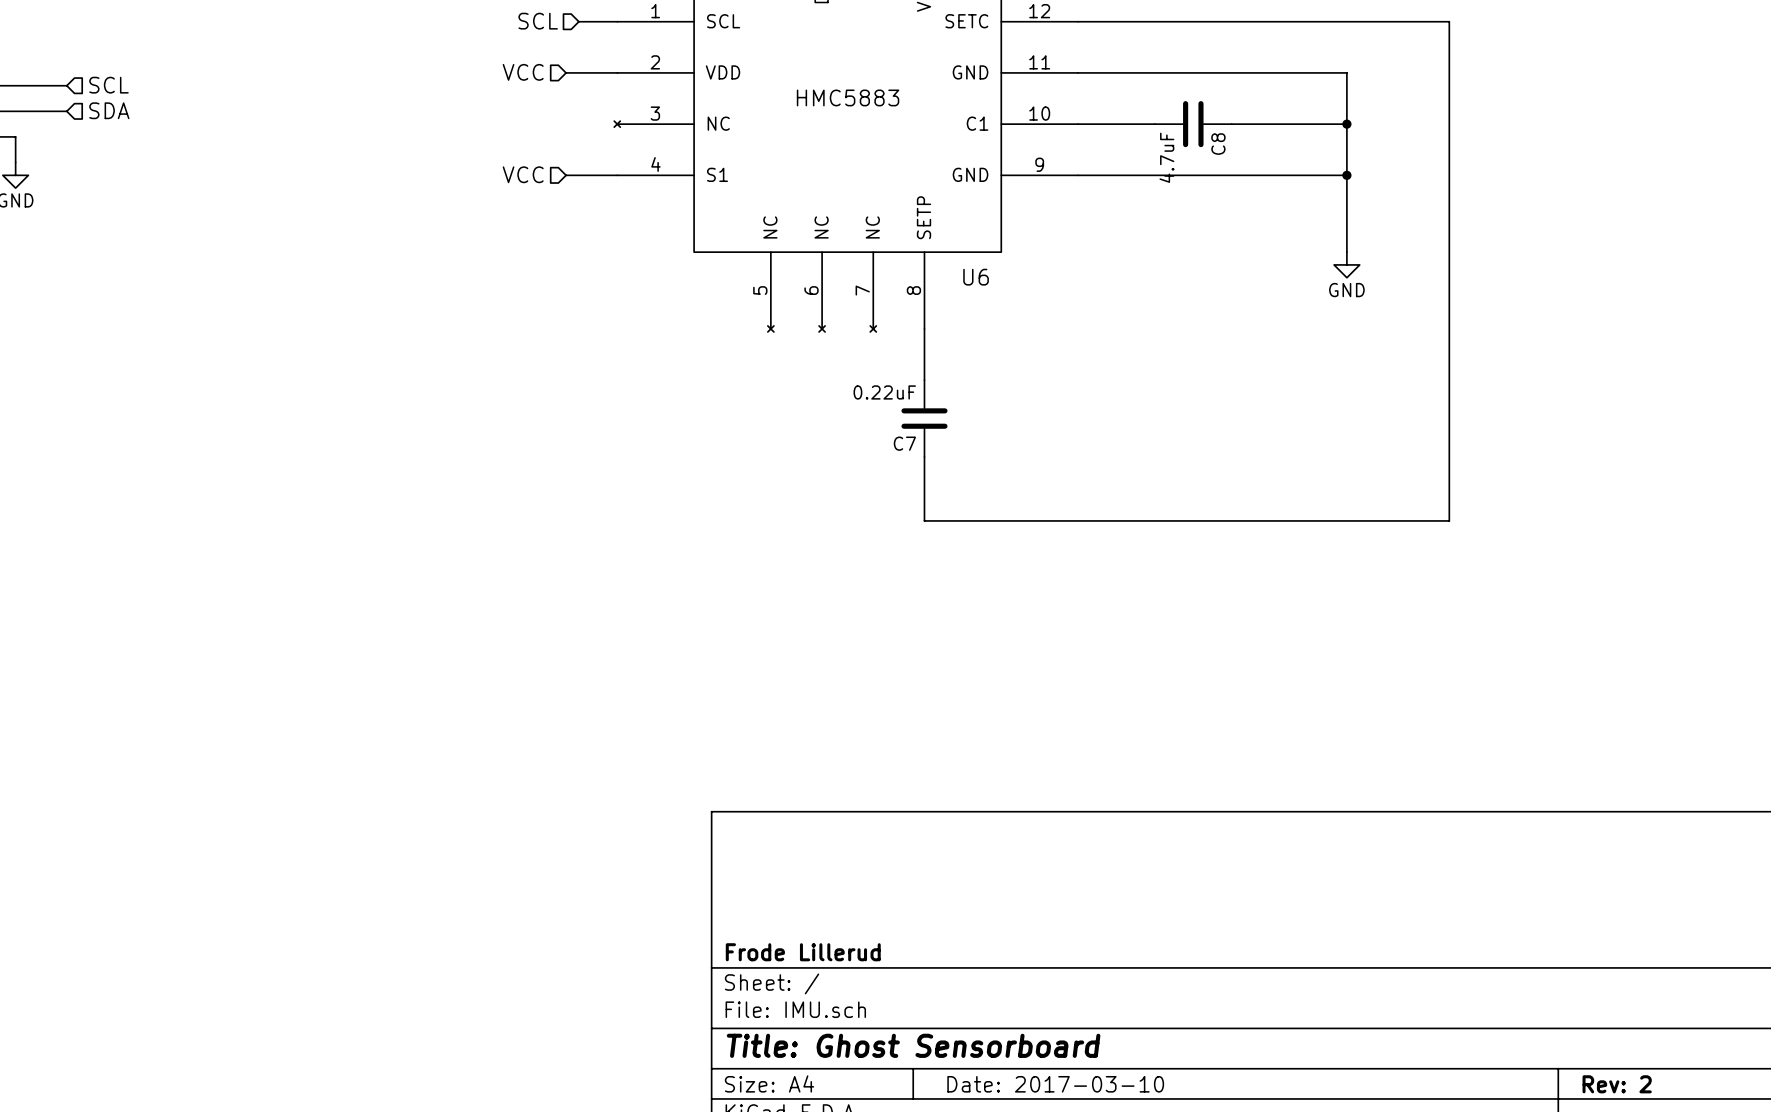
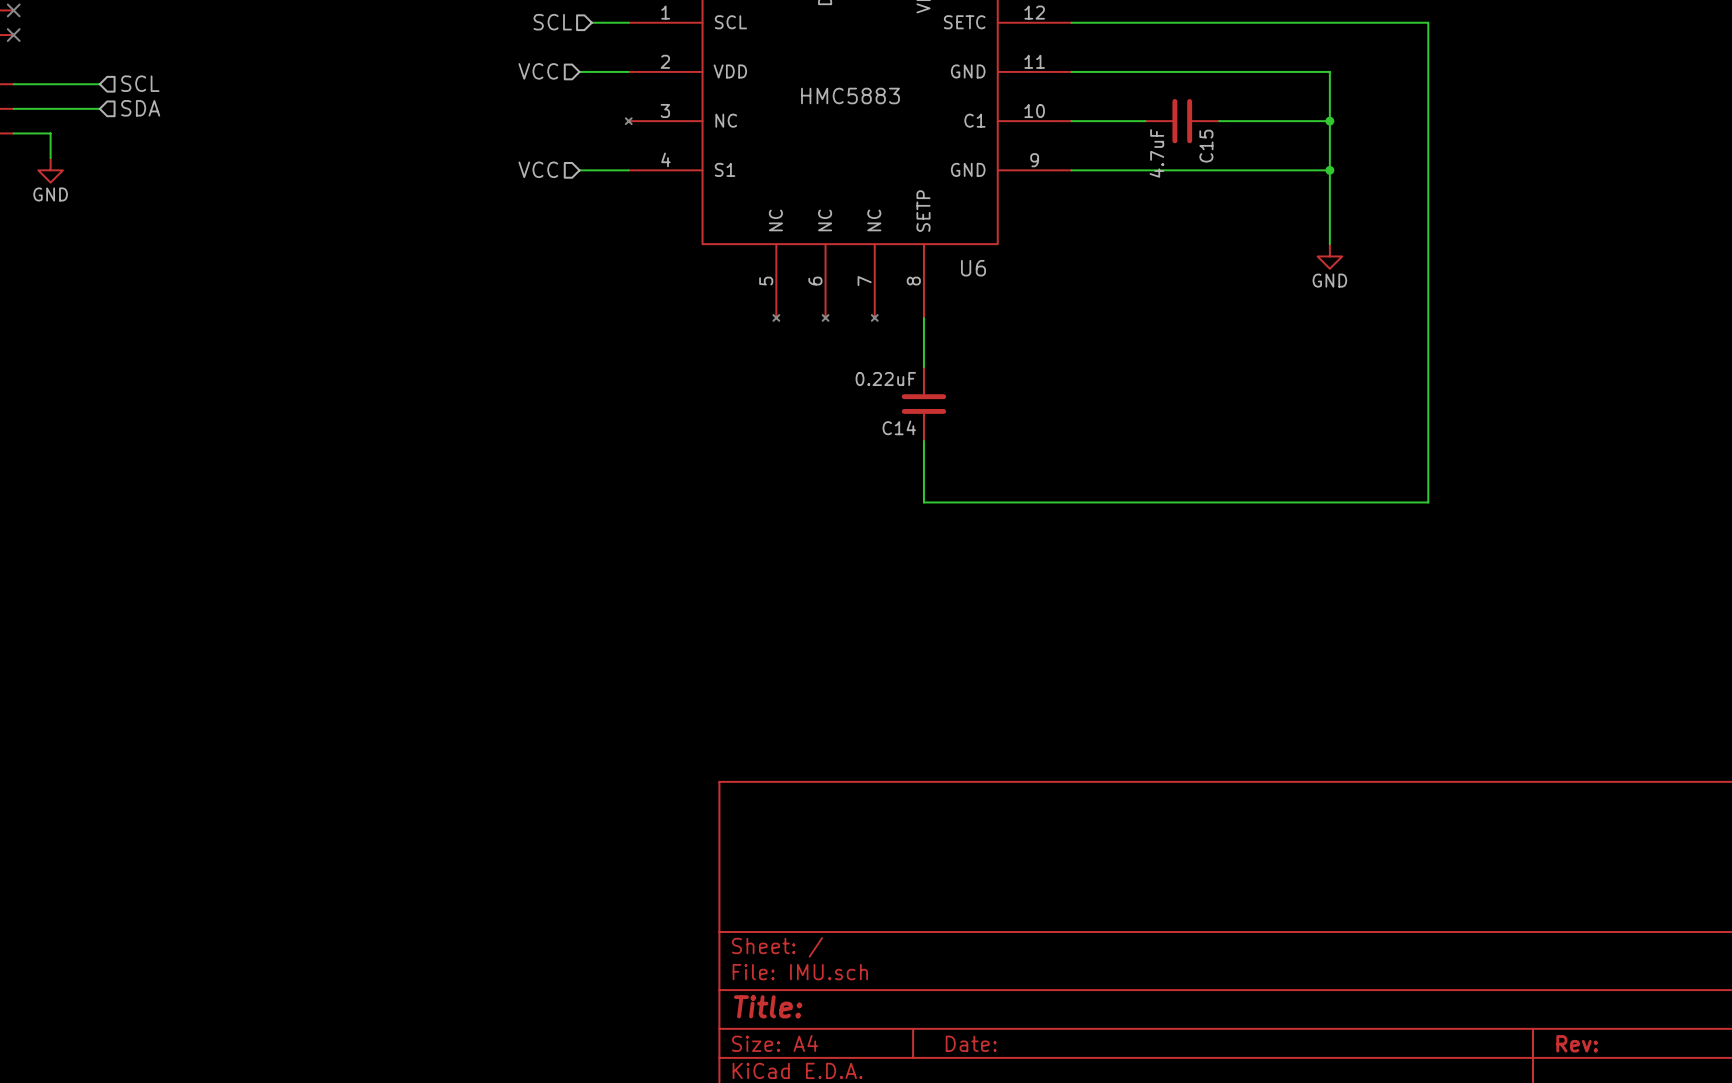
C8 name: C8 (1218, 144) -> C15 (1206, 146)
C7 name: C7 (904, 443) -> C14 (899, 427)
title block: Frode Lillerud (803, 952) -> none
title block: Title: Ghost Sensorboard (913, 1045) -> Title: (768, 1006)
title block: Date: 2017-03-10 (1055, 1084) -> Date: (971, 1043)
title block: Rev: 2 (1617, 1084) -> Rev: (1577, 1043)

